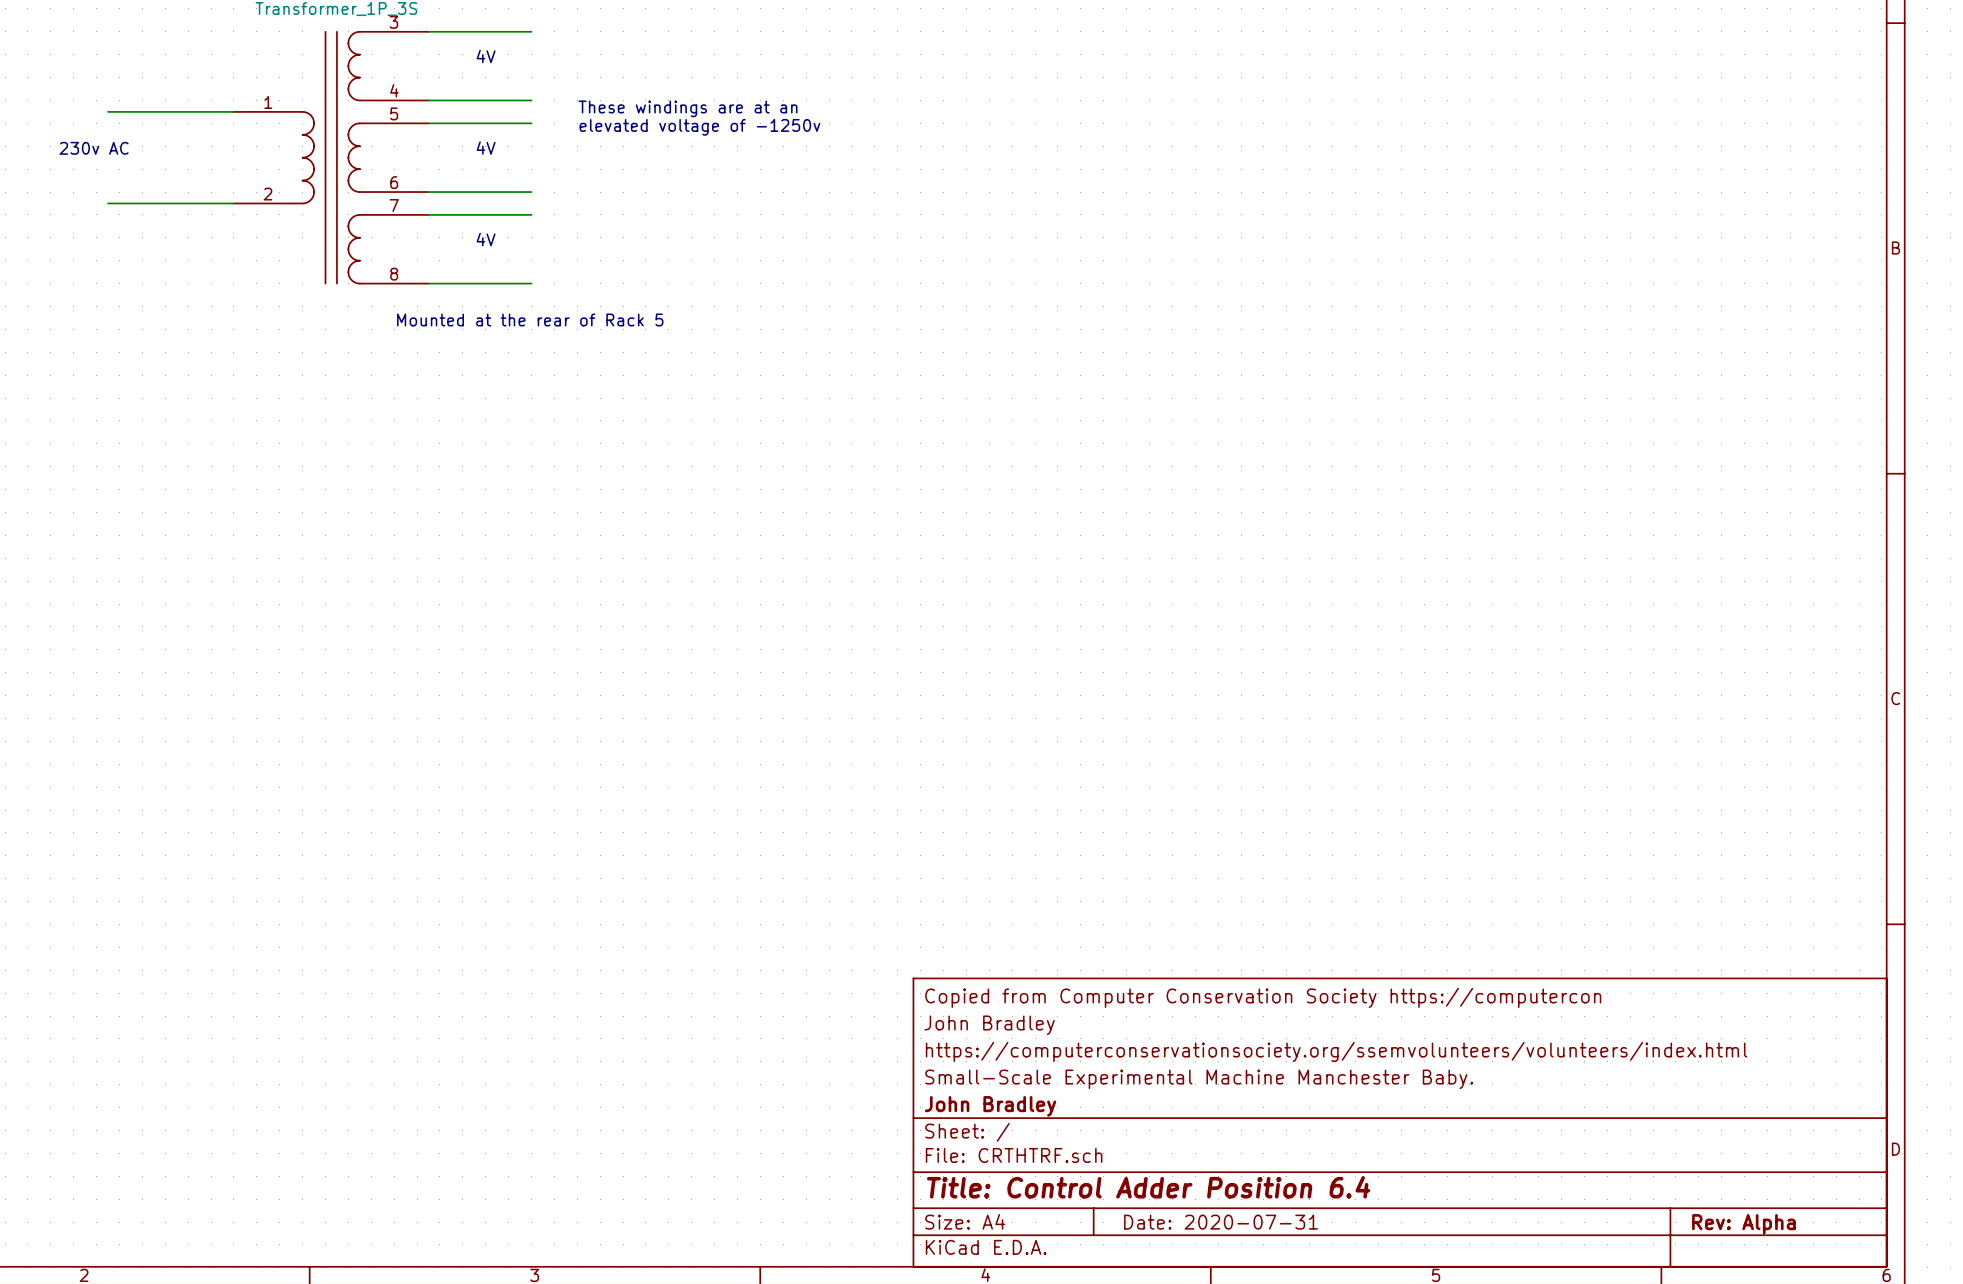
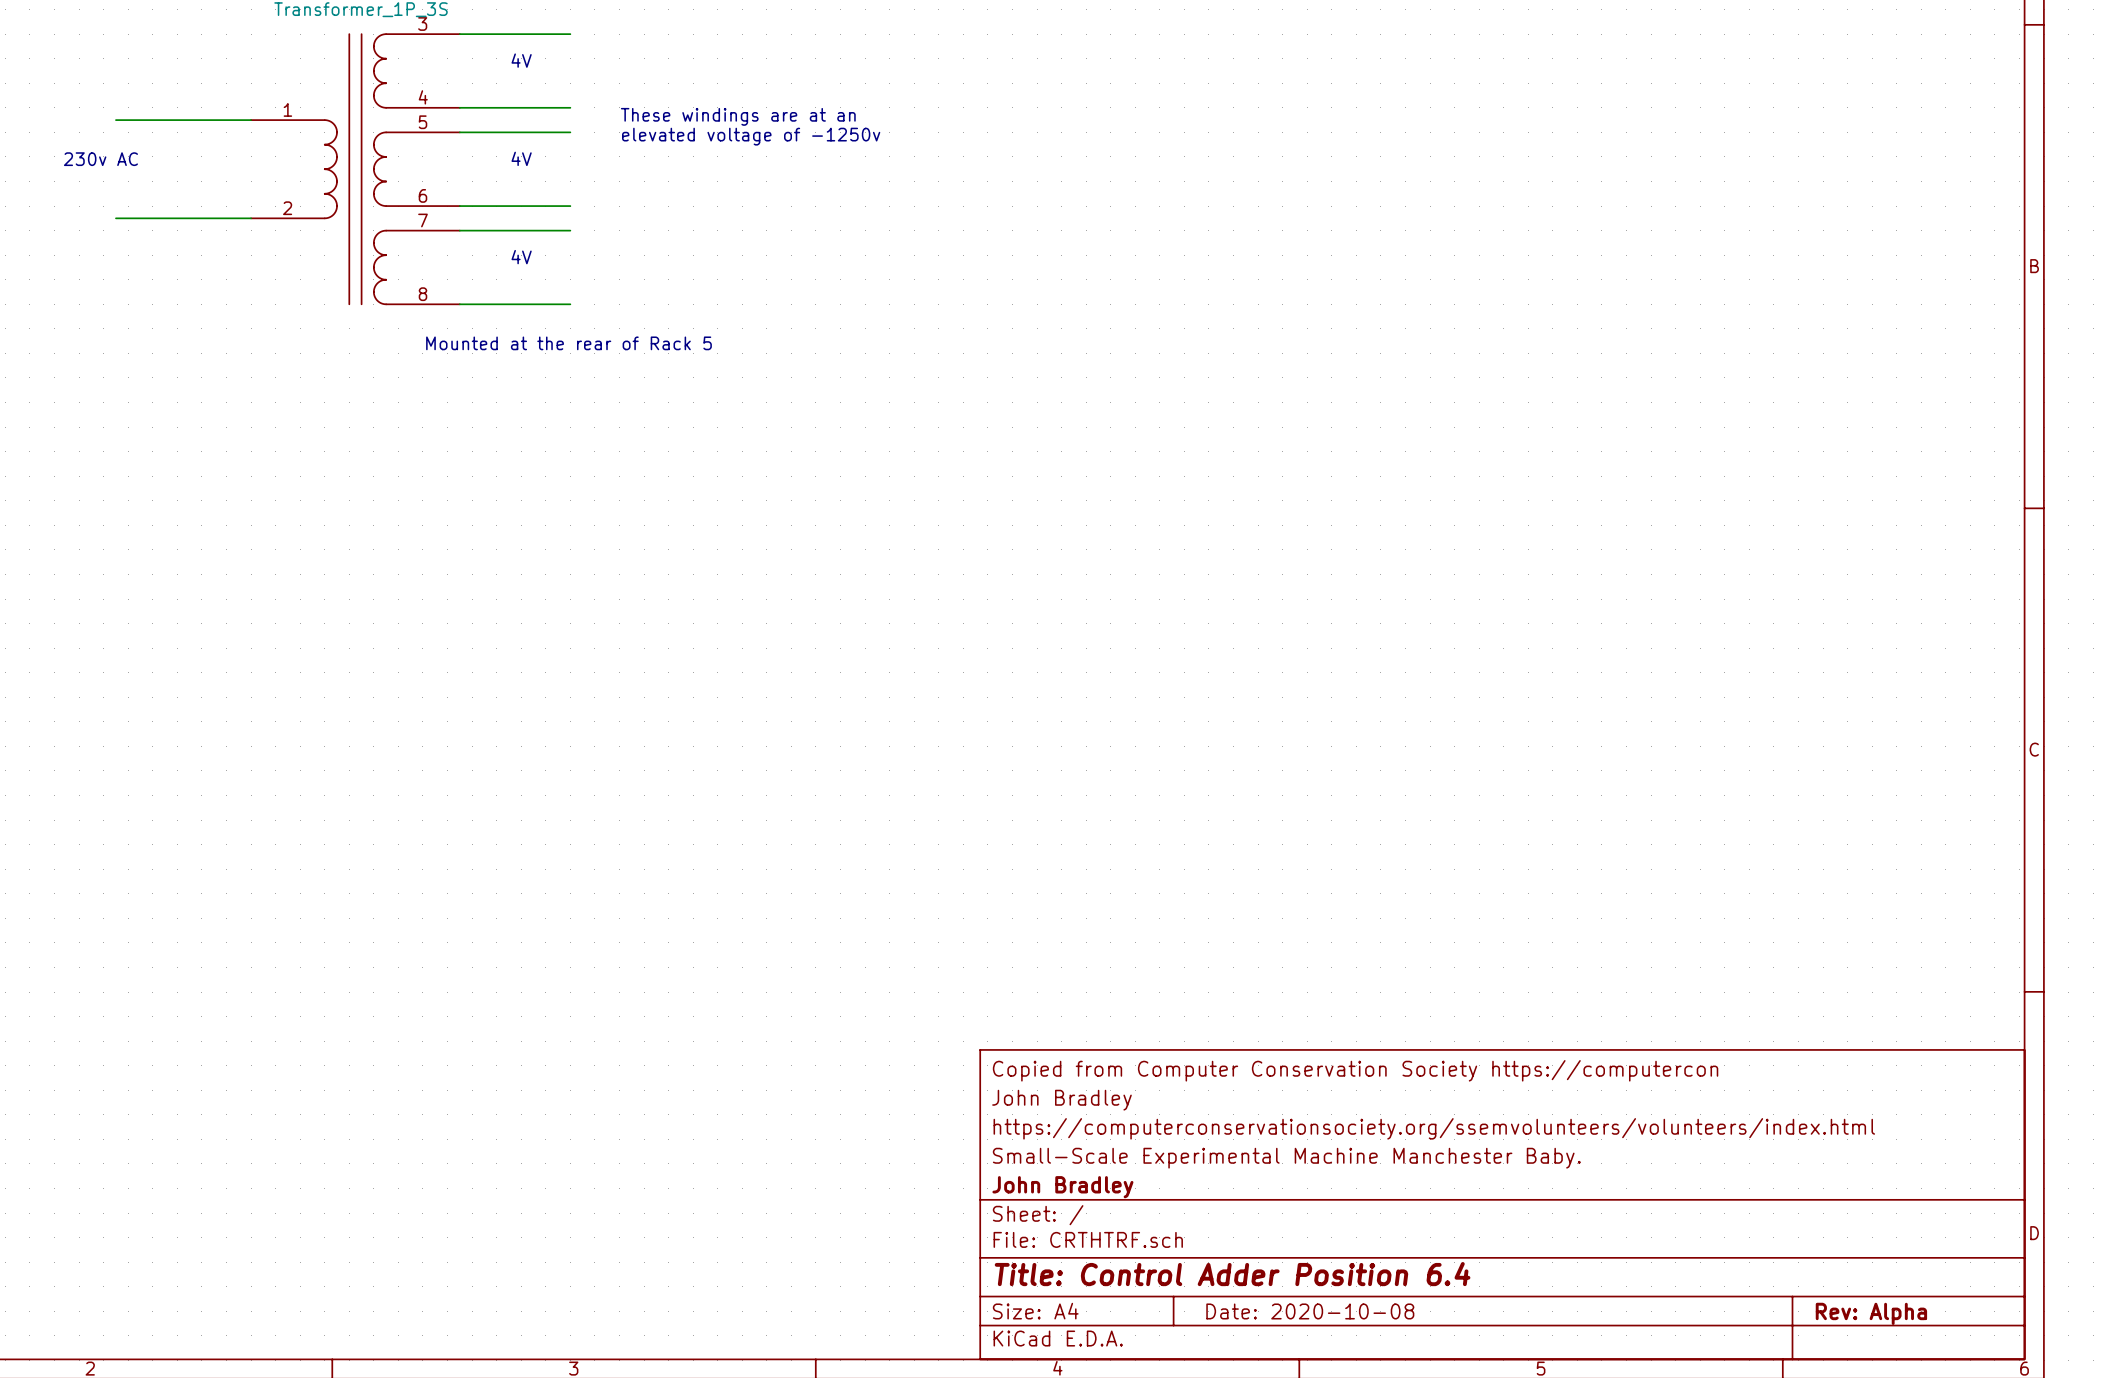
title block: Date: 2020-07-31 (1221, 1222) -> Date: 2020-10-08 (1310, 1311)

